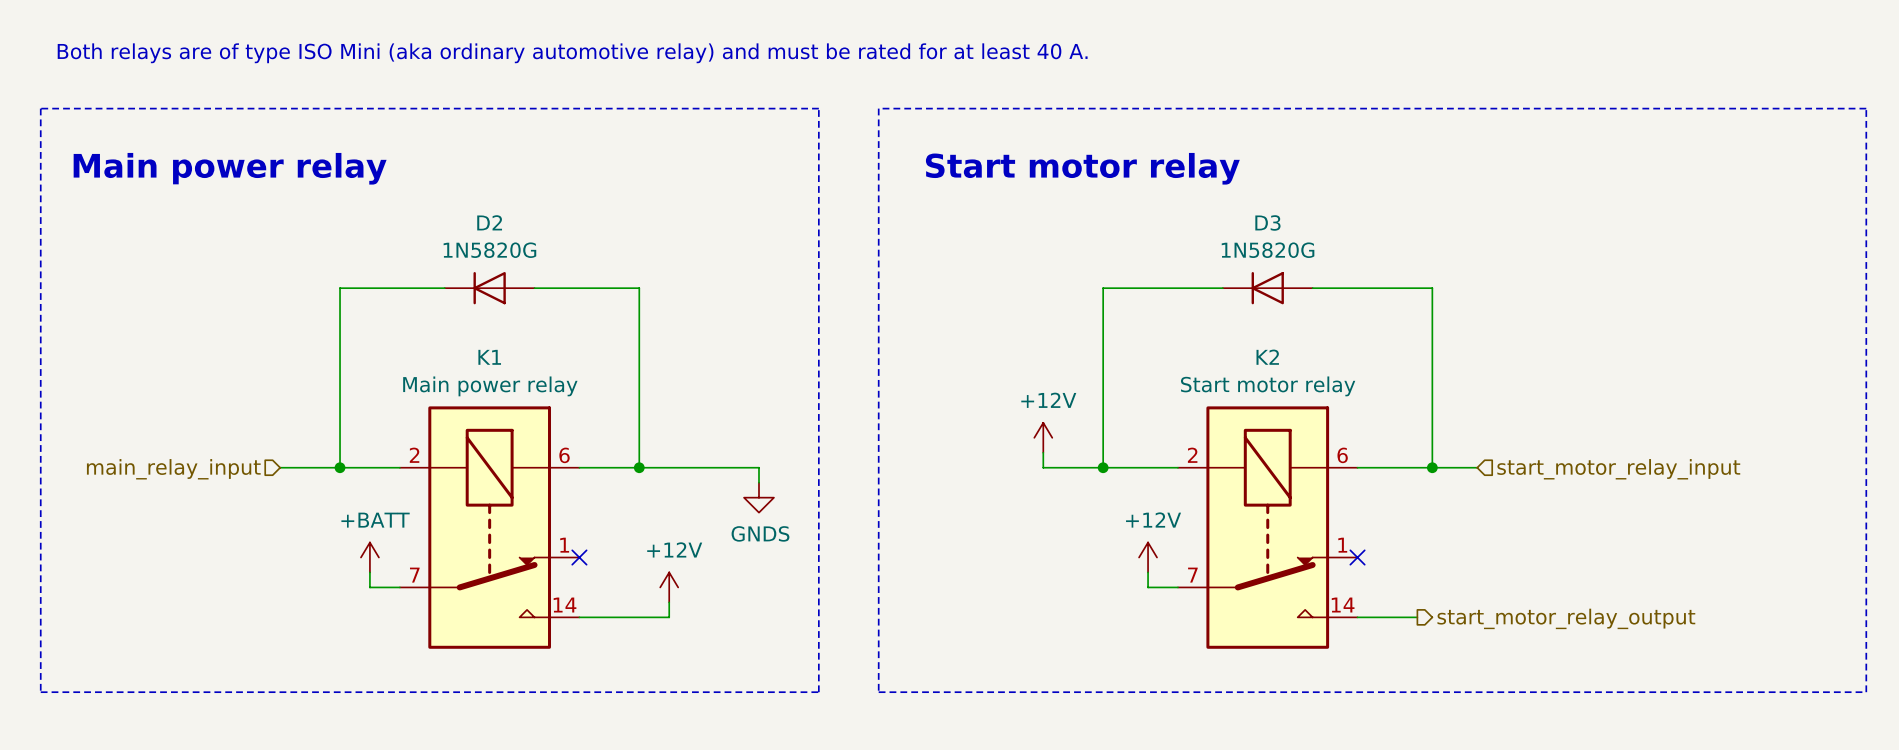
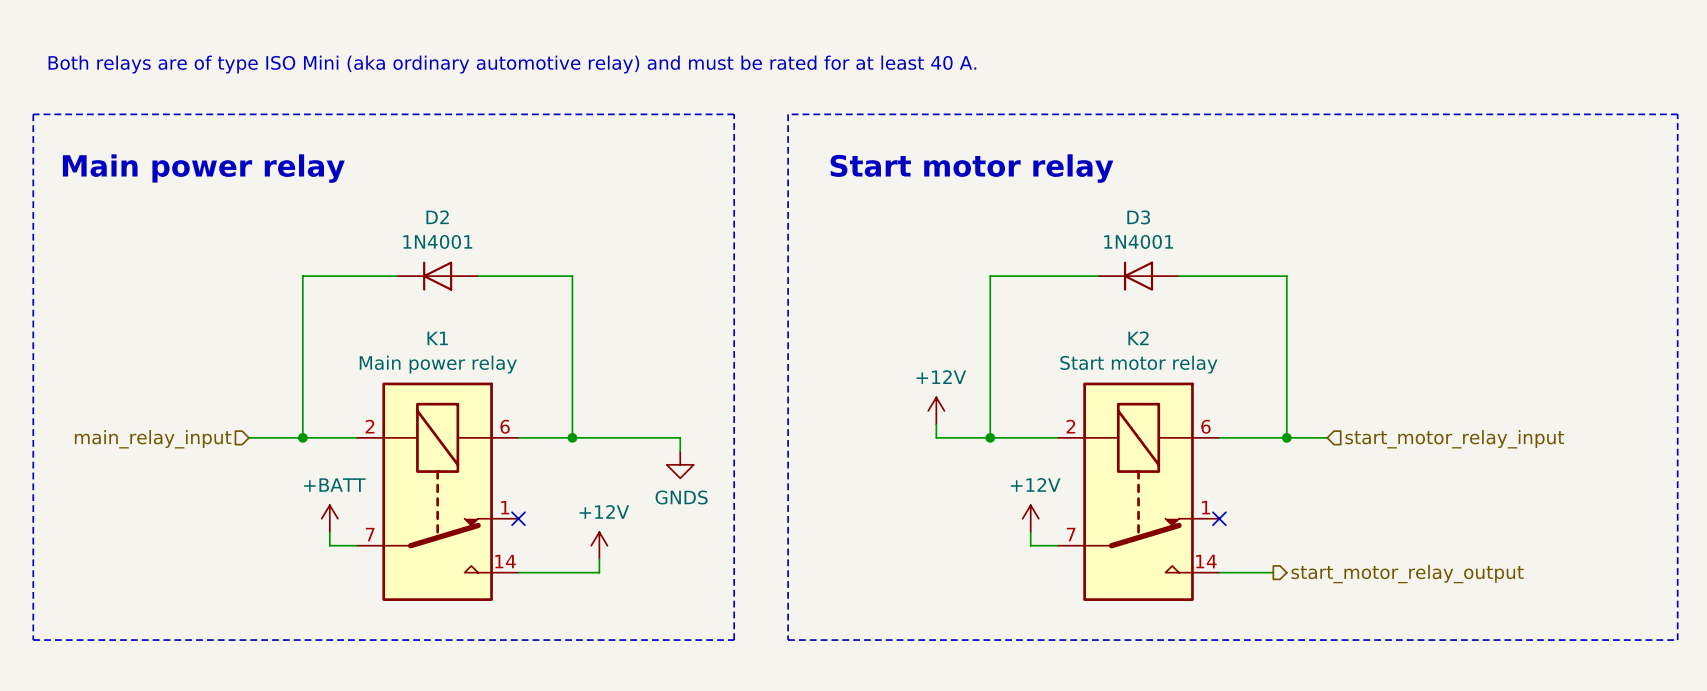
D2 value: 1N5820G (489, 250) -> 1N4001 (437, 241)
D3 value: 1N5820G (1268, 250) -> 1N4001 (1138, 241)

